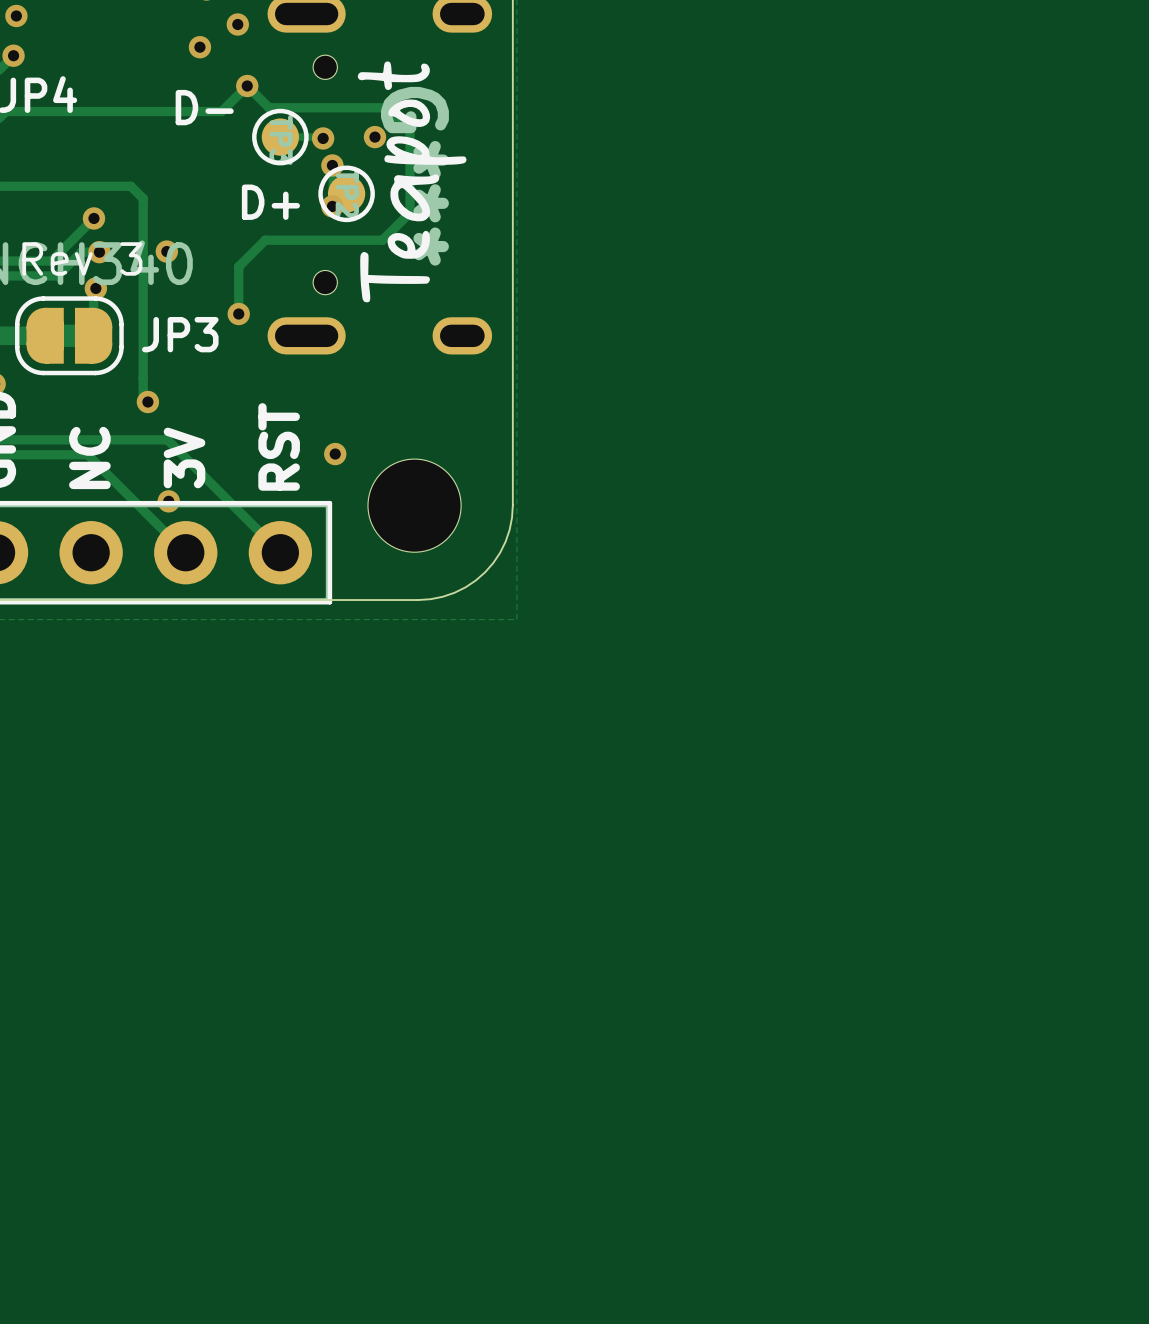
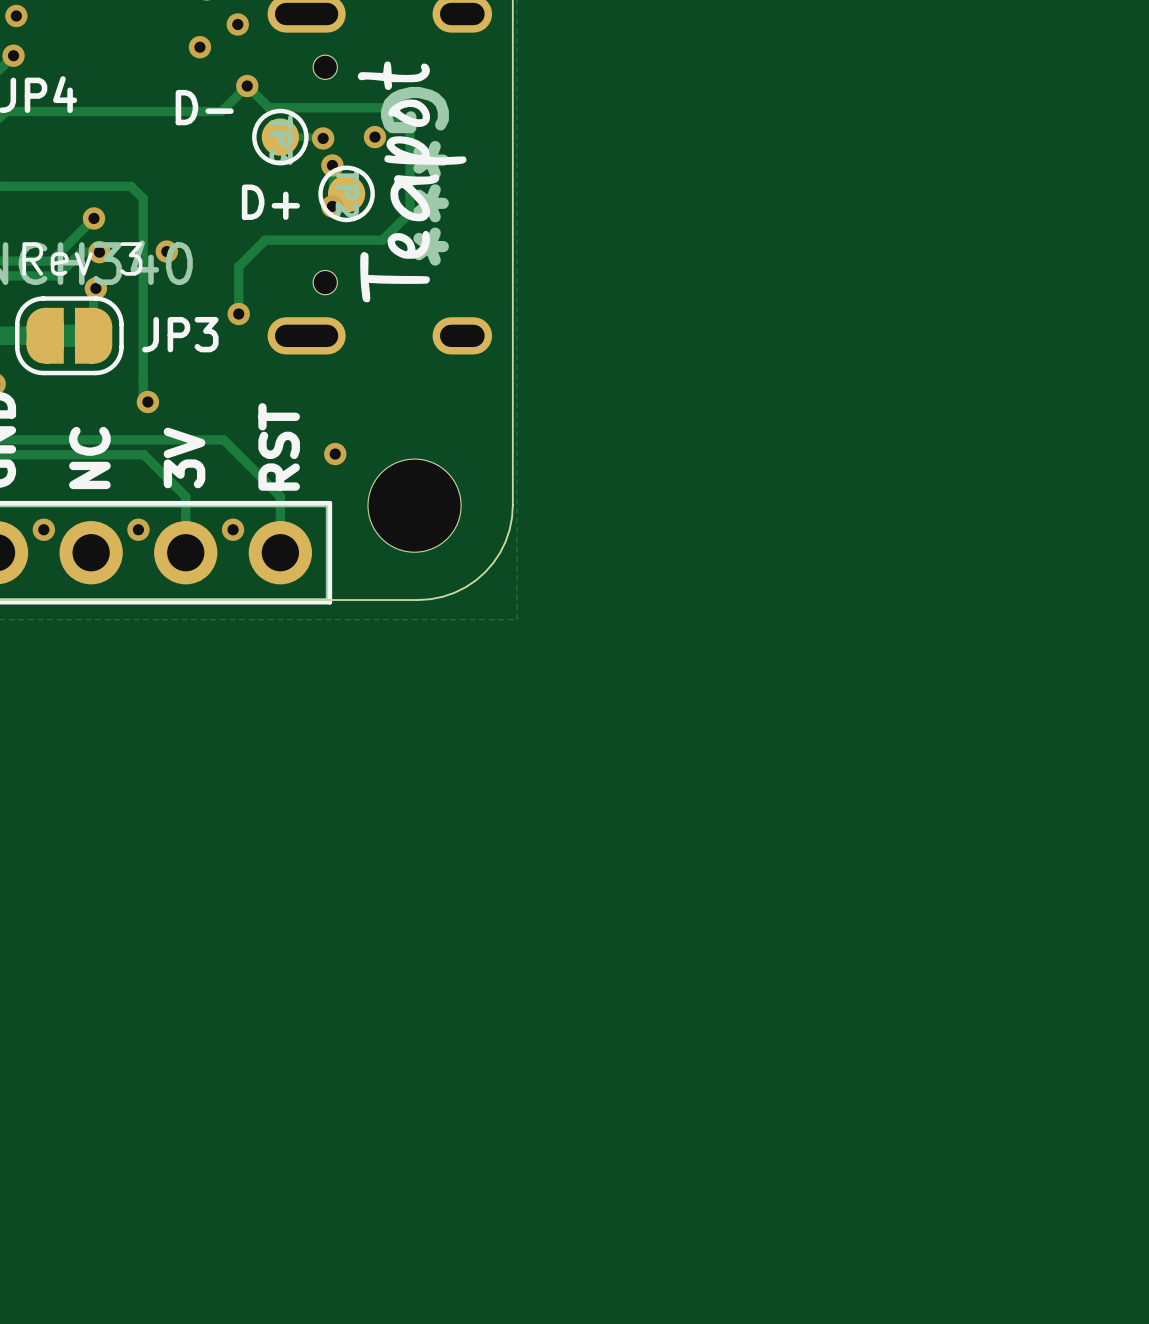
track: (167, 439) (280, 552) -> (167, 439) (223, 439) (280, 496) (280, 552)
track: (87, 454) (185, 552) -> (87, 454) (143, 454) (185, 496) (185, 552)
via: (168, 501) -> none
via: none -> (43, 529)
via: none -> (138, 529)
via: none -> (233, 529)

